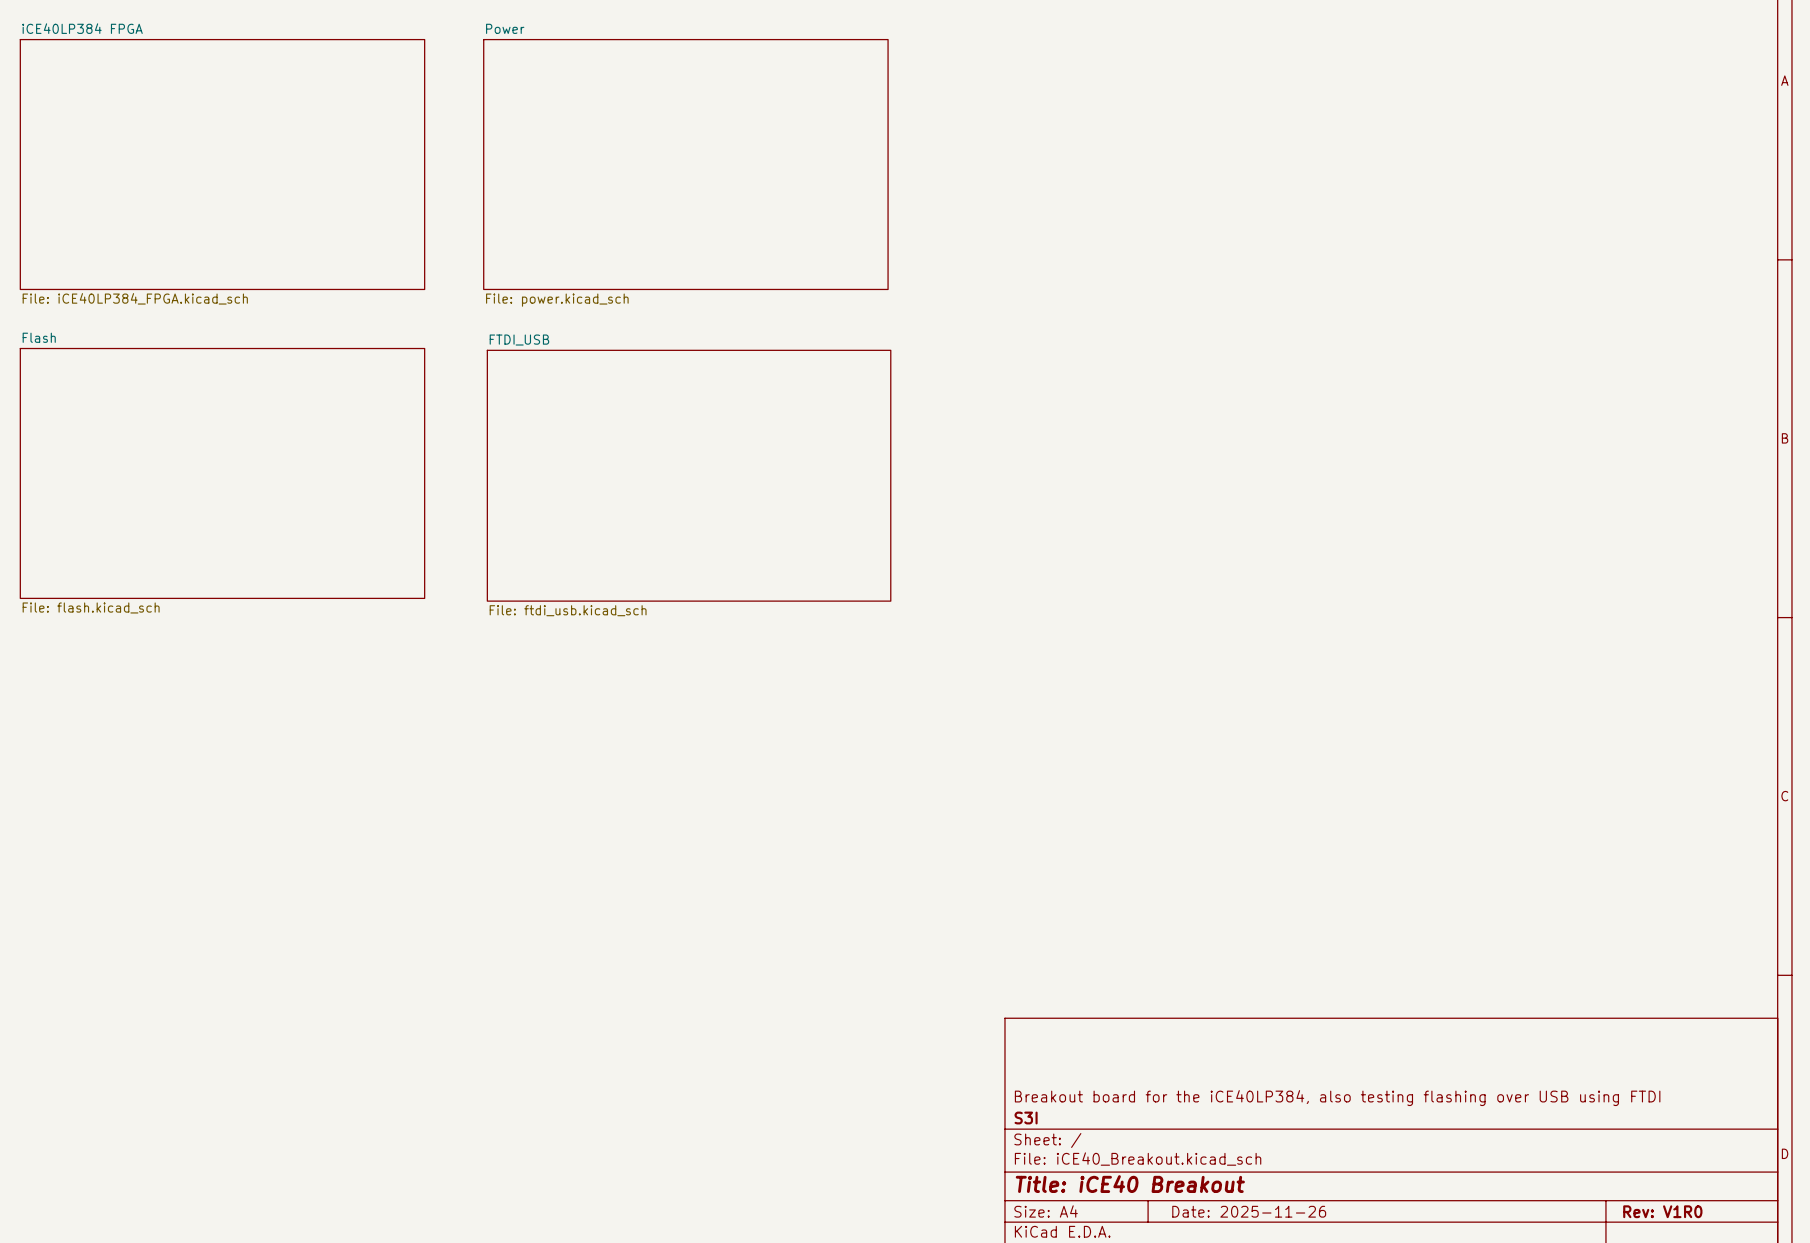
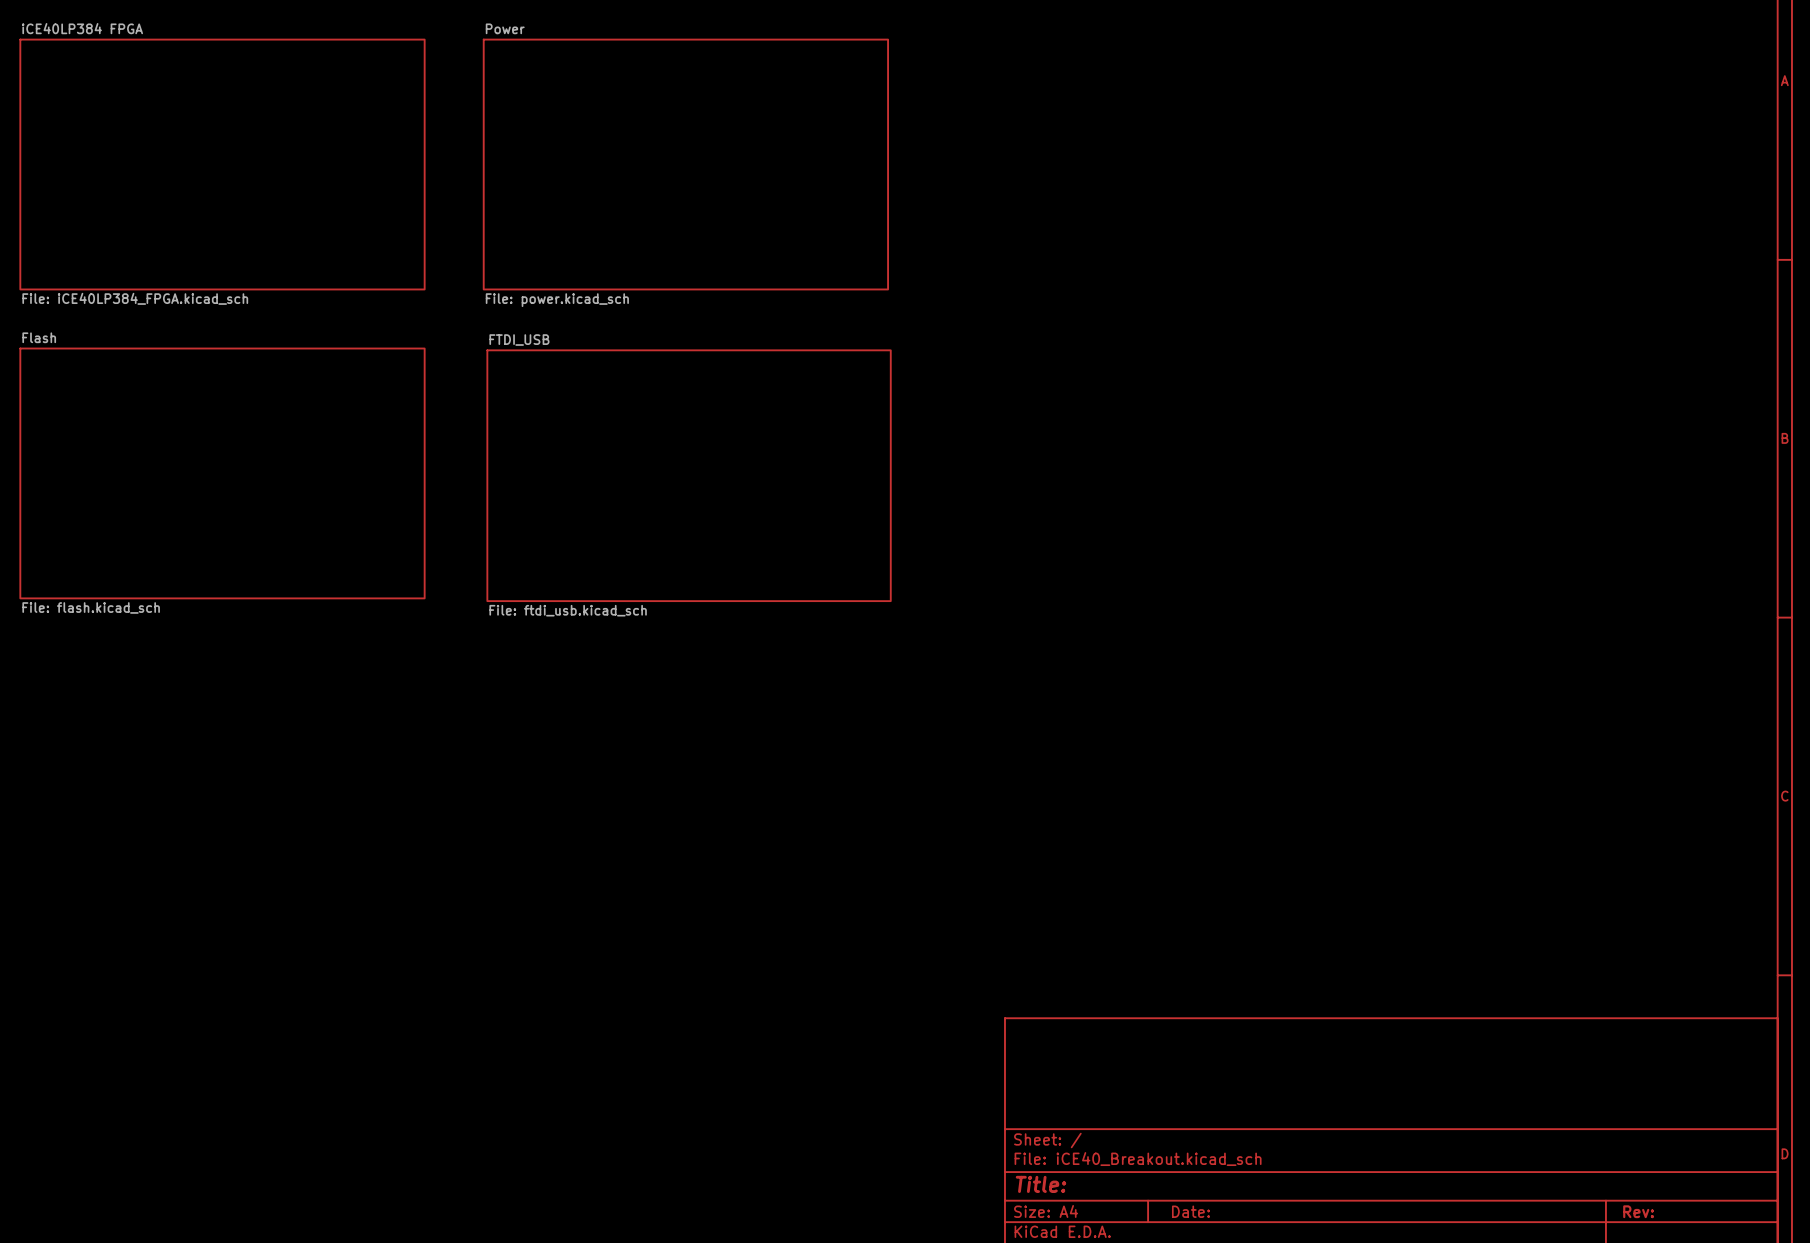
title block: Breakout board for the iCE40LP384, also testing flashing over USB using FTDI (1337, 1098) -> none
title block: S3I (1026, 1118) -> none
title block: Title: iCE40 Breakout (1130, 1184) -> Title: (1040, 1184)
title block: Date: 2025-11-26 (1249, 1211) -> Date: (1190, 1211)
title block: Rev: V1R0 (1662, 1211) -> Rev: (1638, 1211)

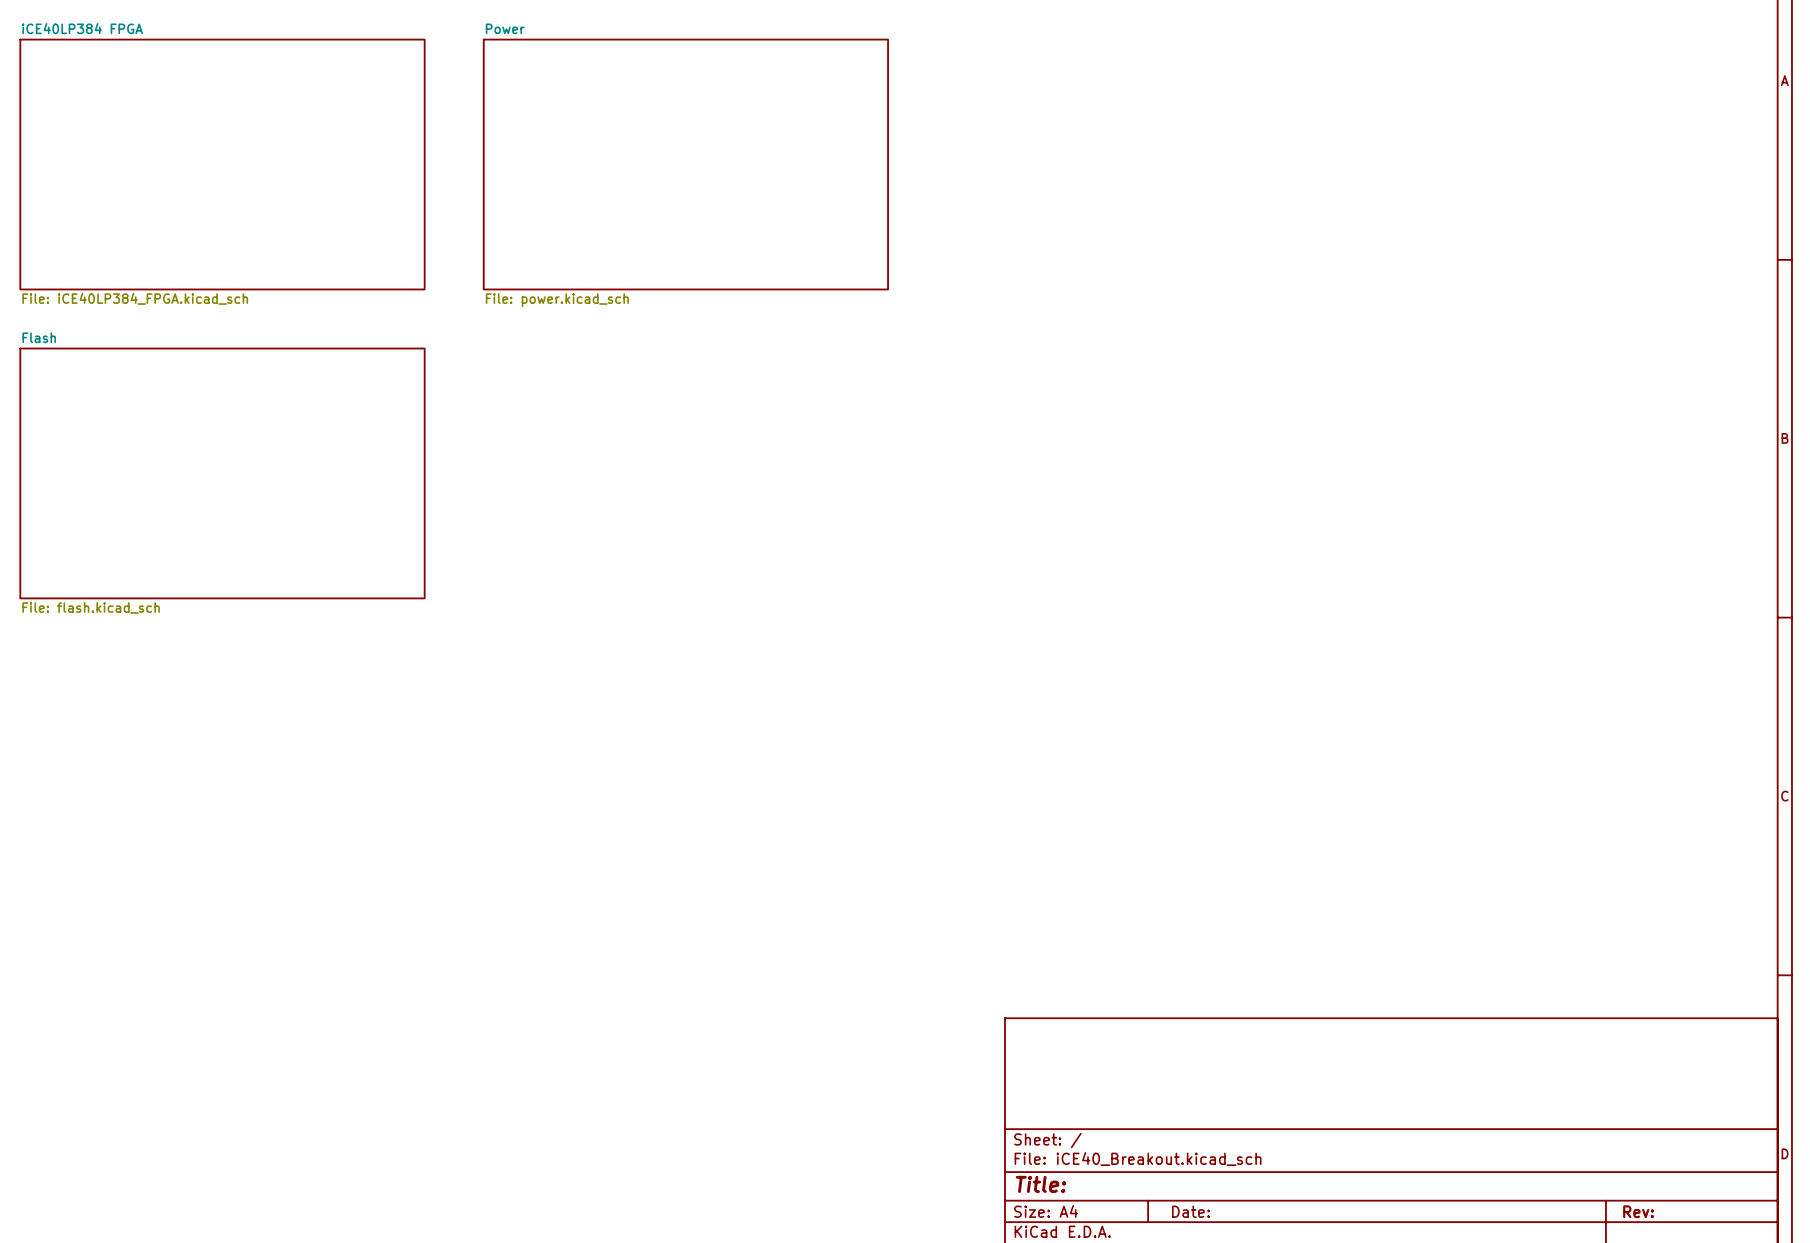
sheet FTDI_USB: File: ftdi_usb.kicad_sch (689, 475) -> none

